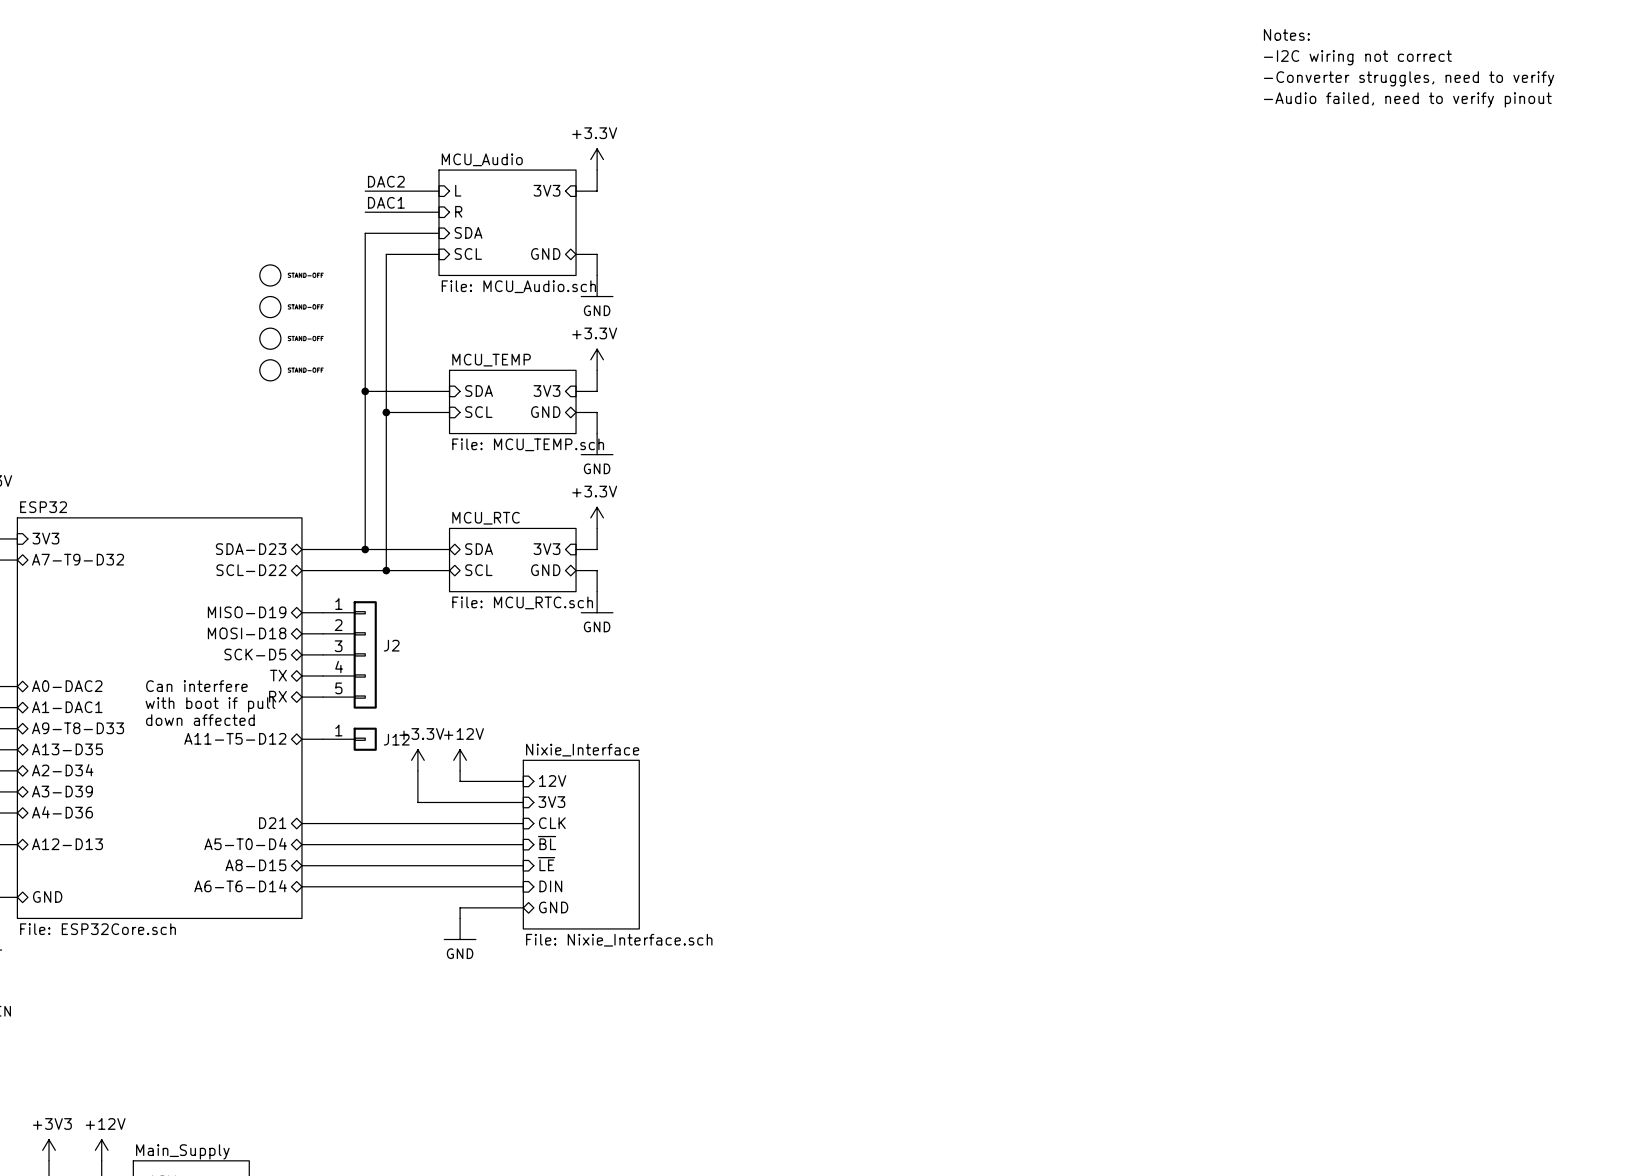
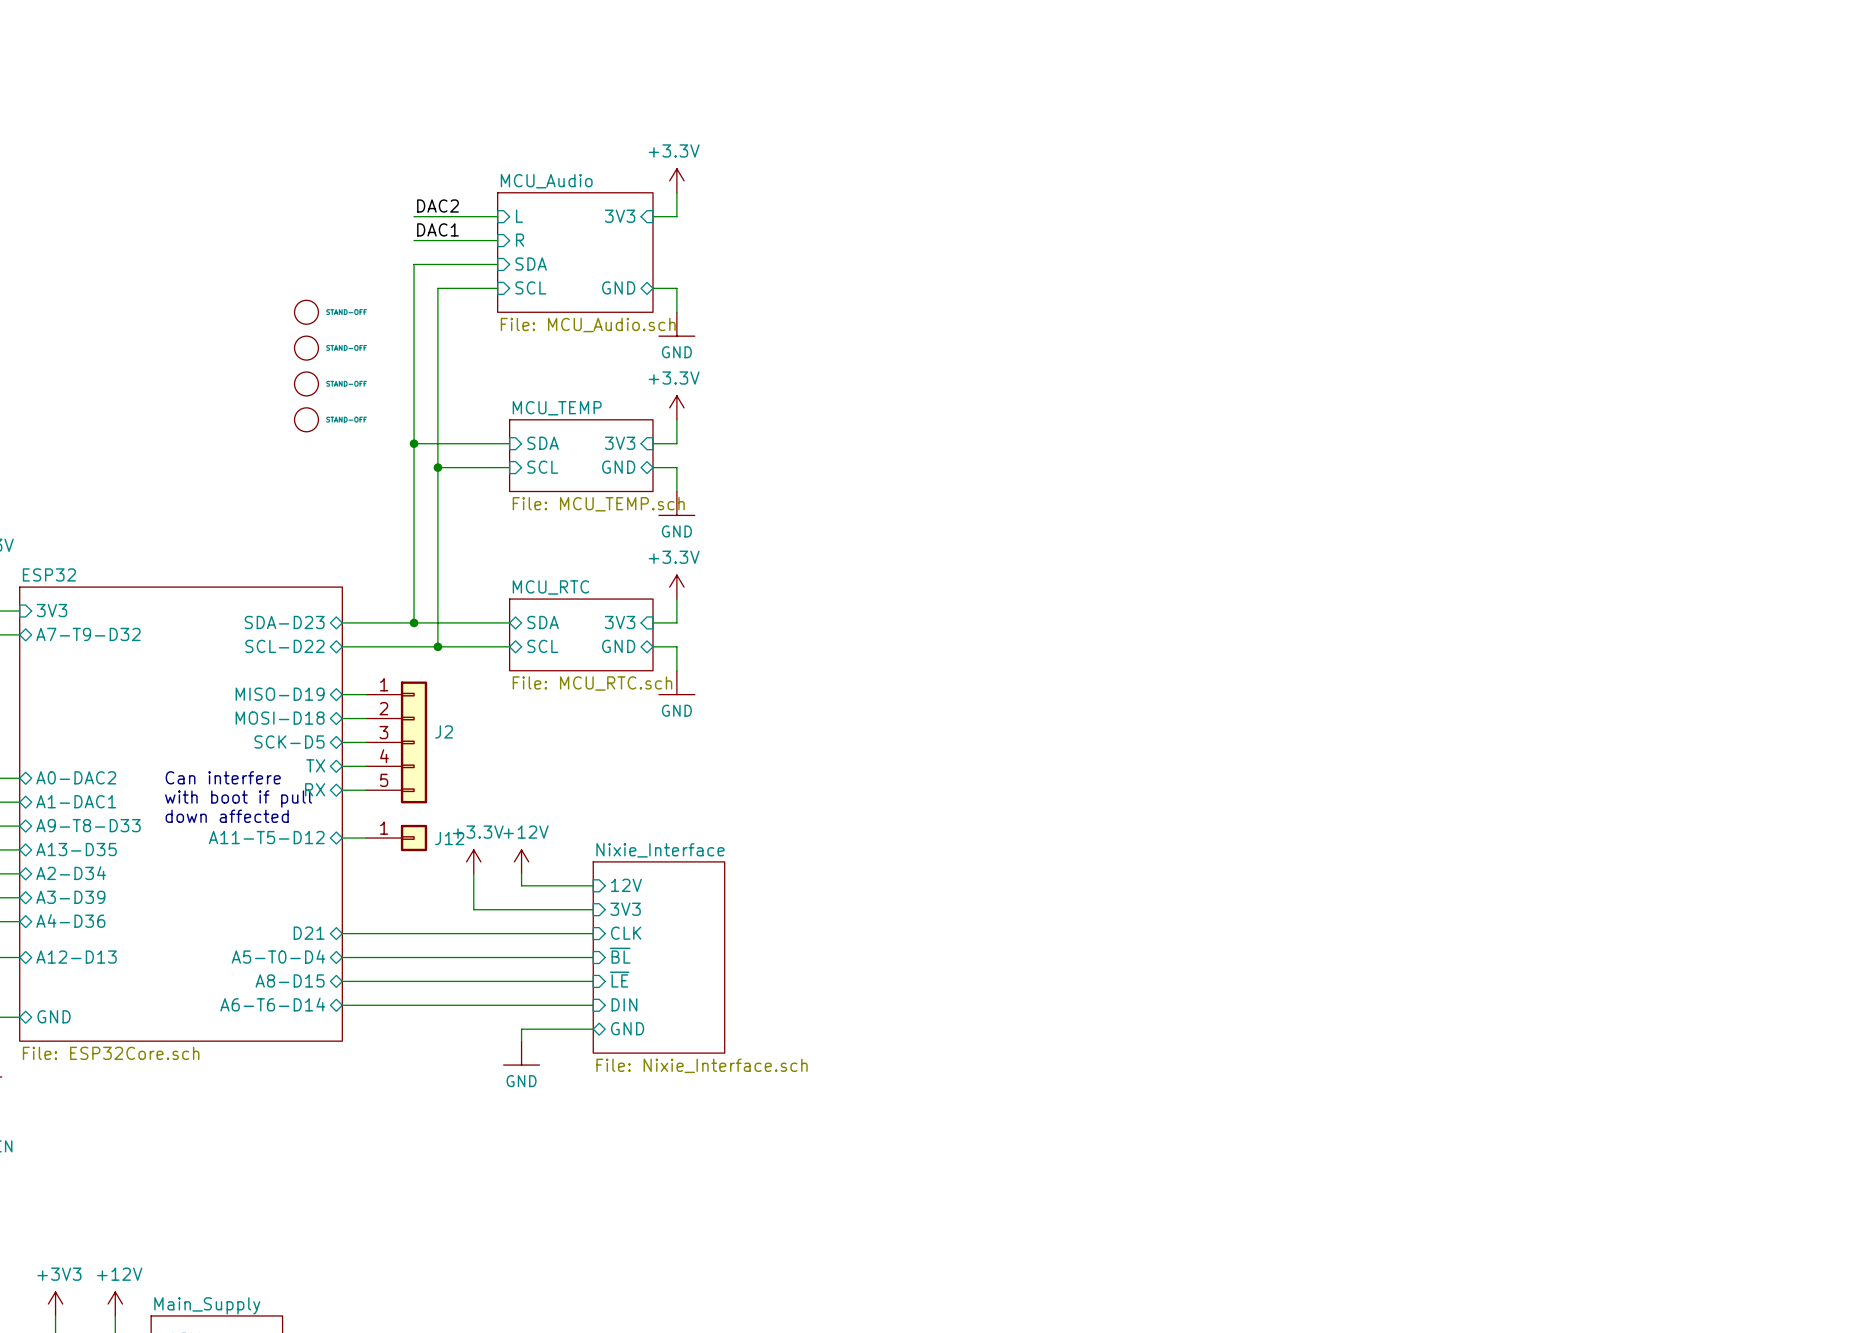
text: Notes: (1286, 34) -> none
text: -I2C wiring not correct (1357, 57) -> none
text: -Converter struggles, need to verify (1409, 78) -> none
text: -Audio failed, need to verify pinout (1407, 99) -> none

